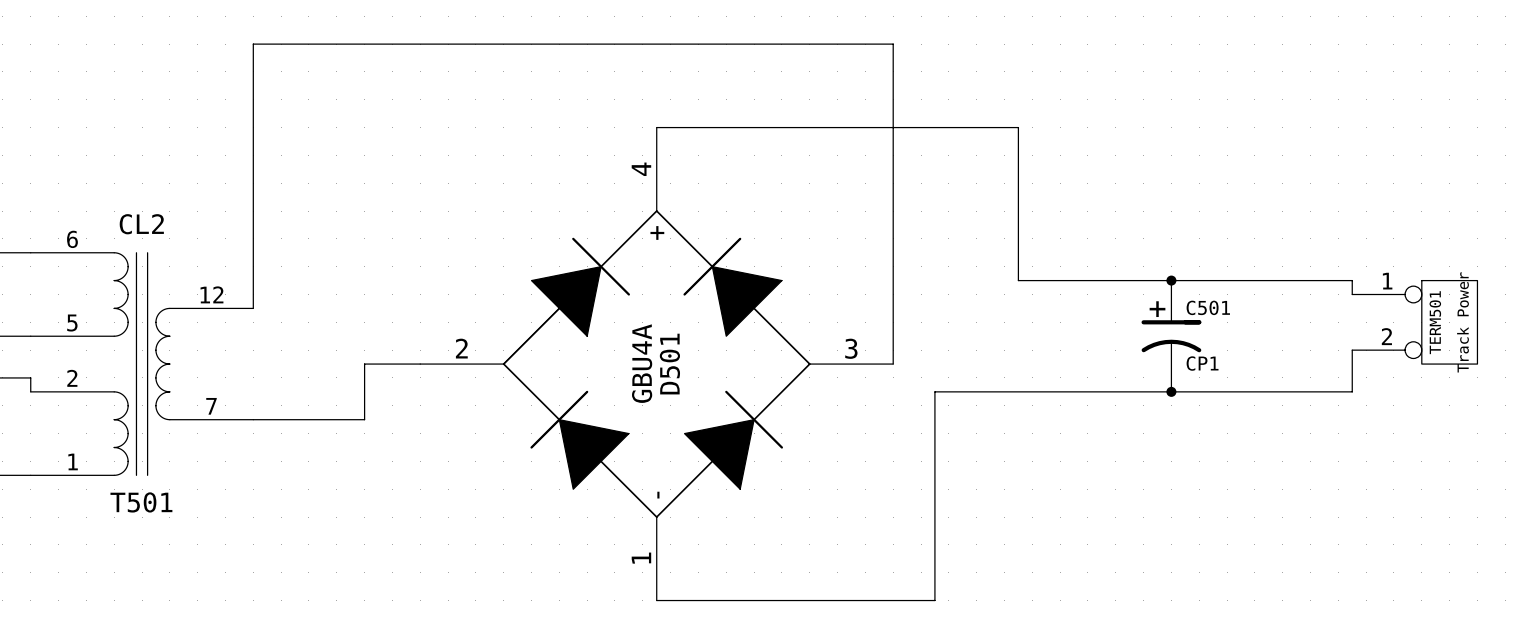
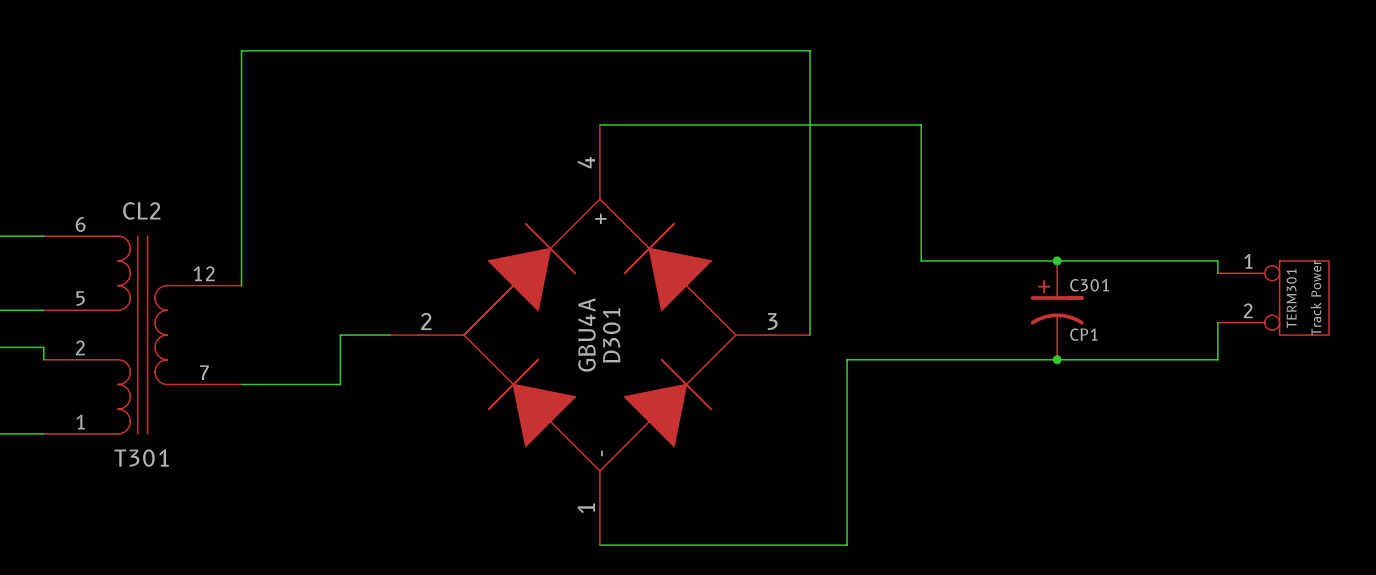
C501 name: C501 (1208, 307) -> C301 (1089, 285)
TERM501 name: TERM501 (1435, 322) -> TERM301 (1291, 298)
D501 name: D501 (669, 364) -> D301 (611, 335)
T501 name: T501 (141, 502) -> T301 (141, 458)

